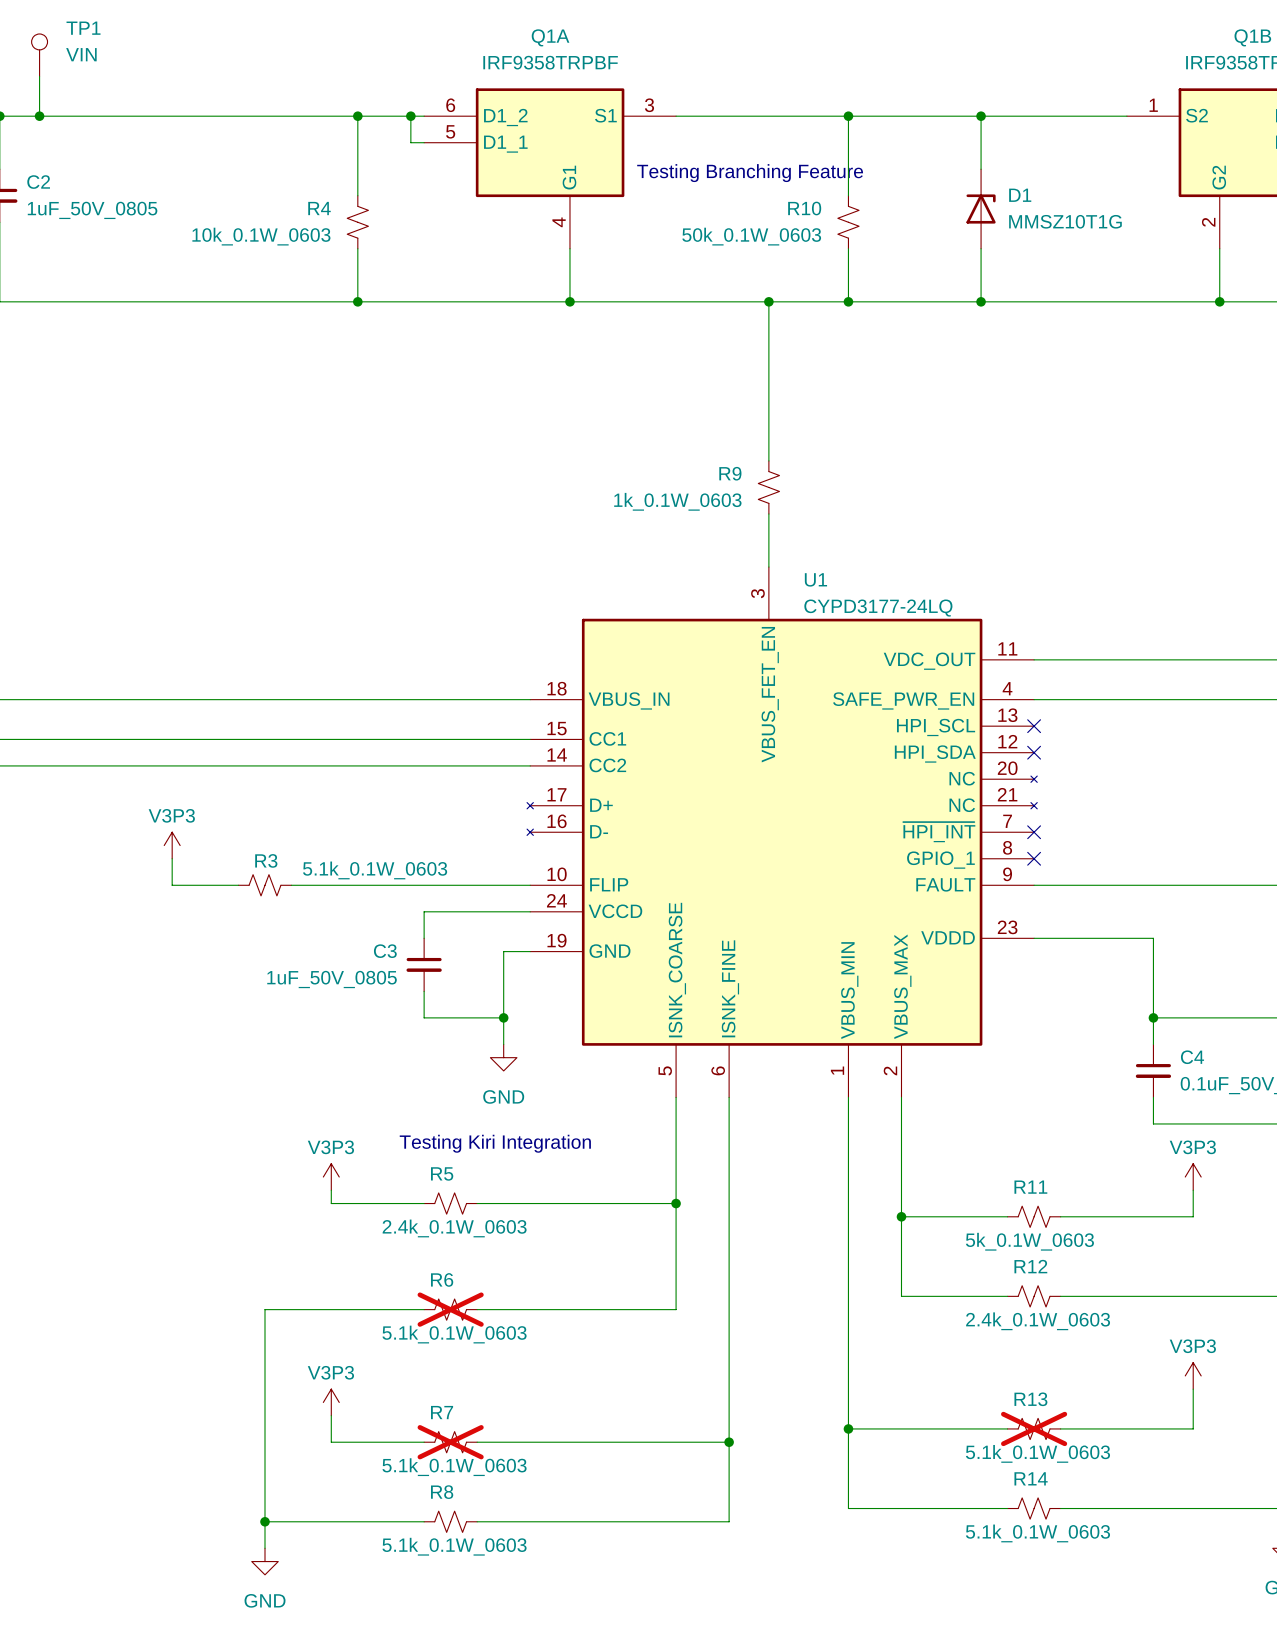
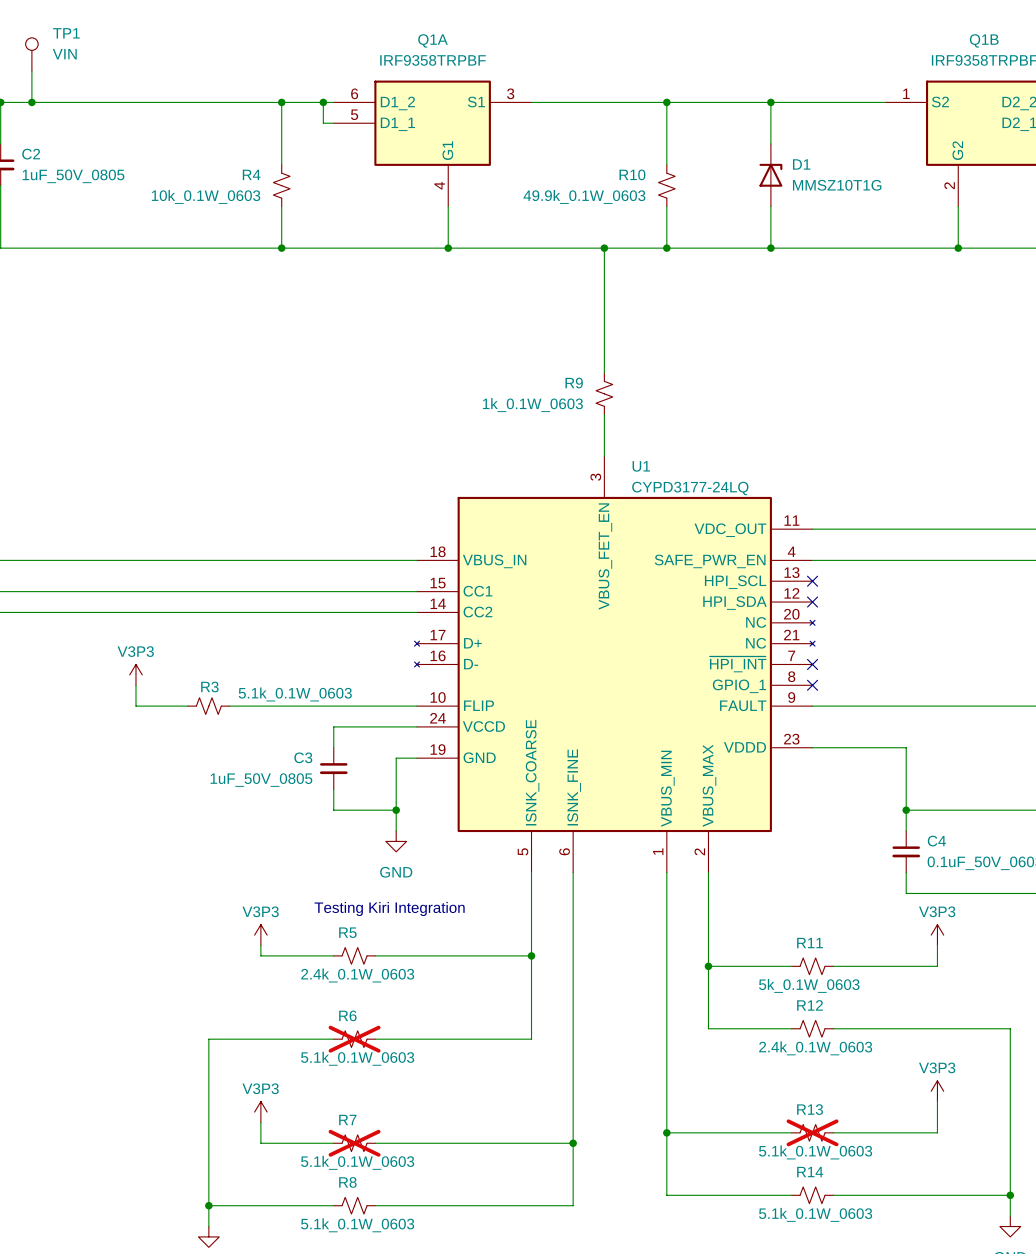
text: Testing Branching Feature (750, 173) -> none
R10 value: 50k_0.1W_0603 (751, 236) -> 49.9k_0.1W_0603 (584, 196)

